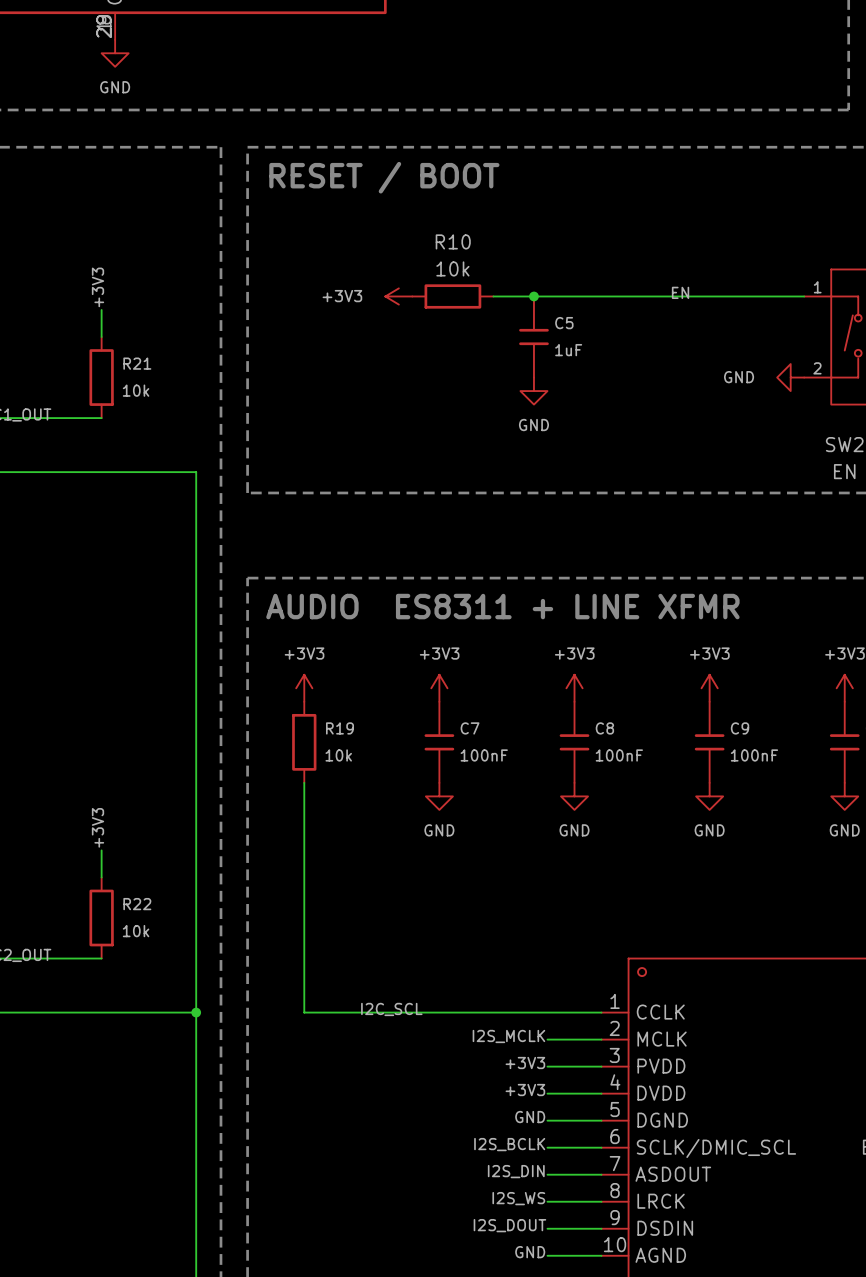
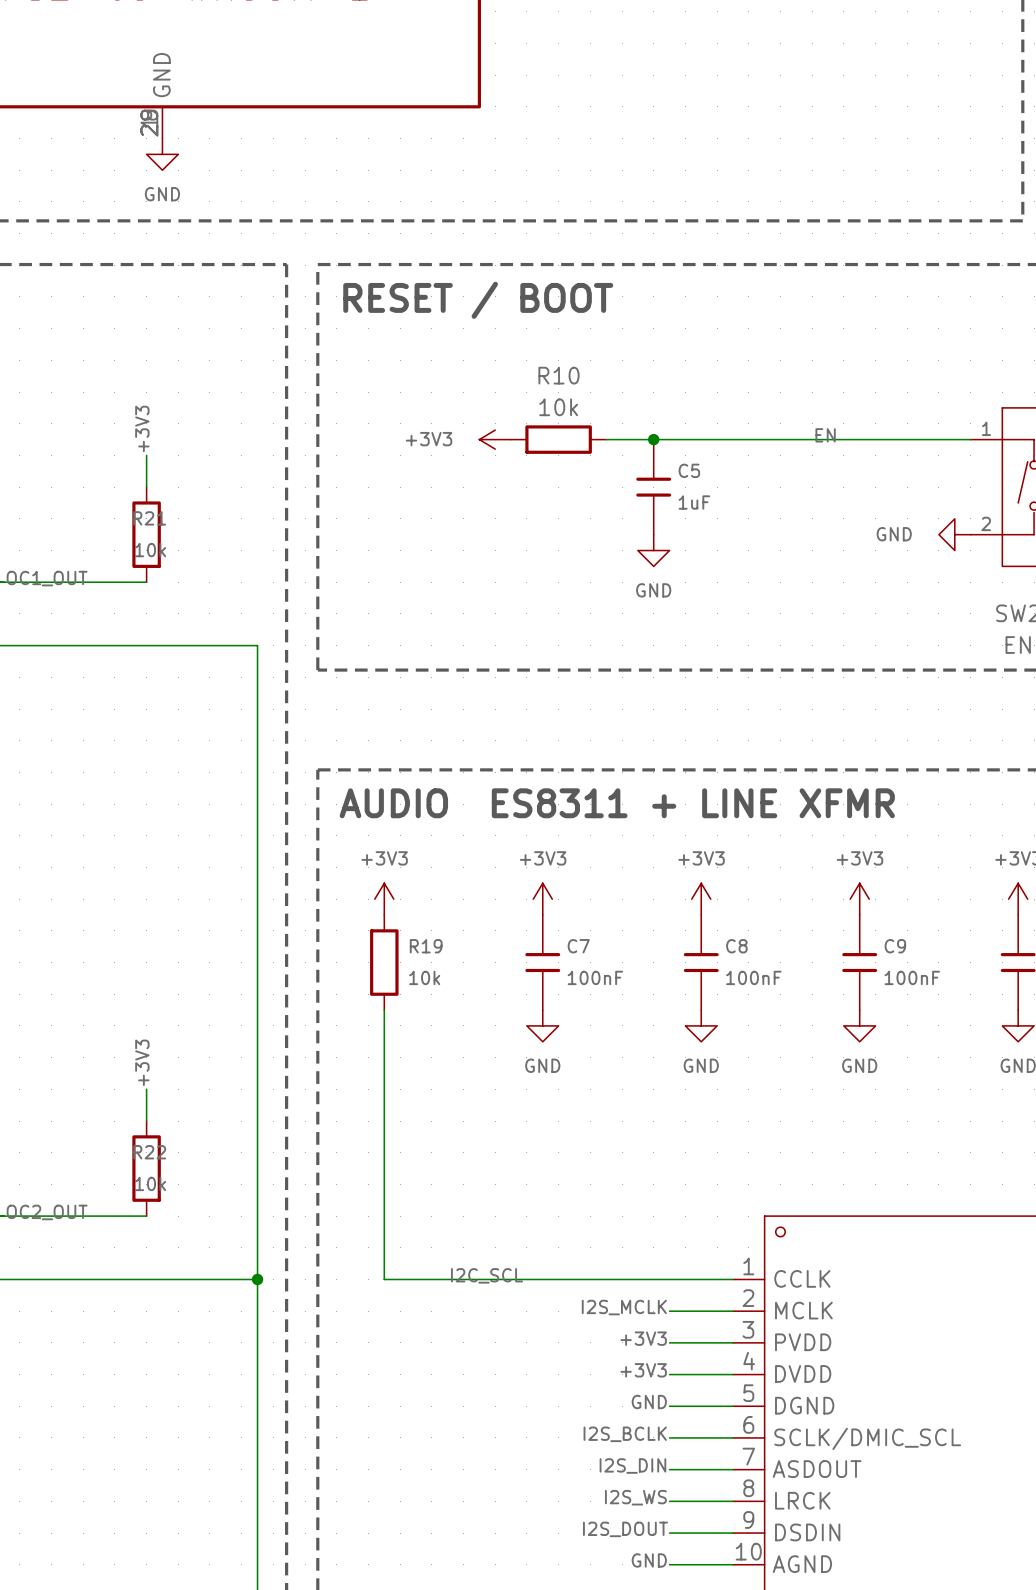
R21 name position: R21 (137, 363) -> R21 (149, 518)
R21 value position: 10k (136, 390) -> 10k (150, 550)
R22 name position: R22 (137, 904) -> R22 (149, 1152)
R22 value position: 10k (136, 931) -> 10k (150, 1183)

